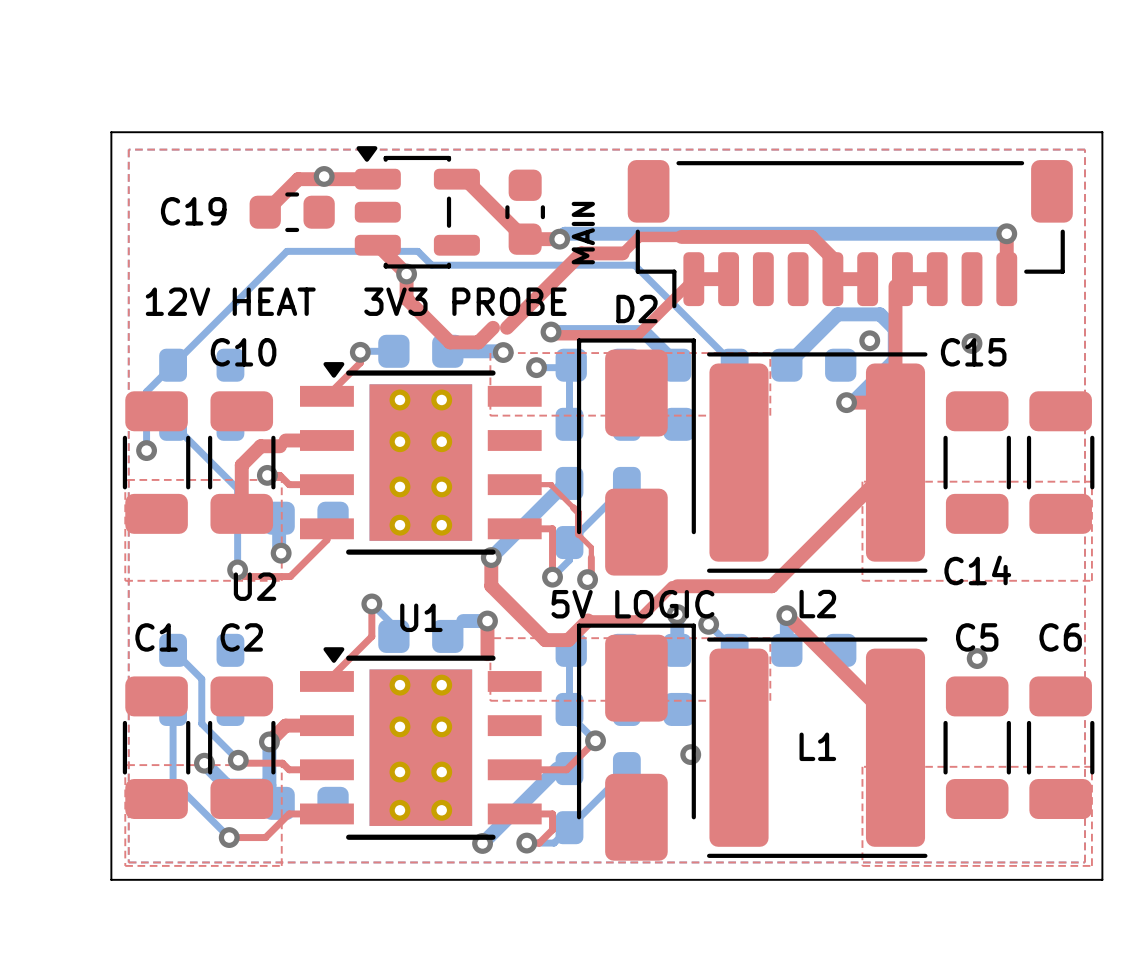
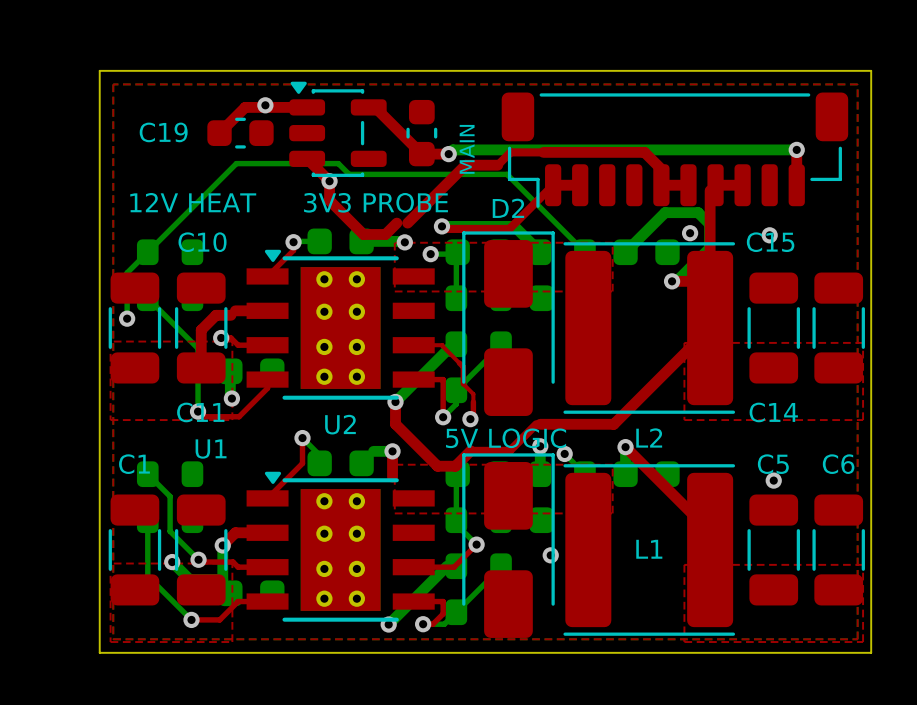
C11 name: none -> C11 (200, 412)
U2 name position: U2 (255, 586) -> U2 (340, 424)
U1 name position: U1 (421, 617) -> U1 (211, 449)
C2 name: C2 (241, 637) -> none

